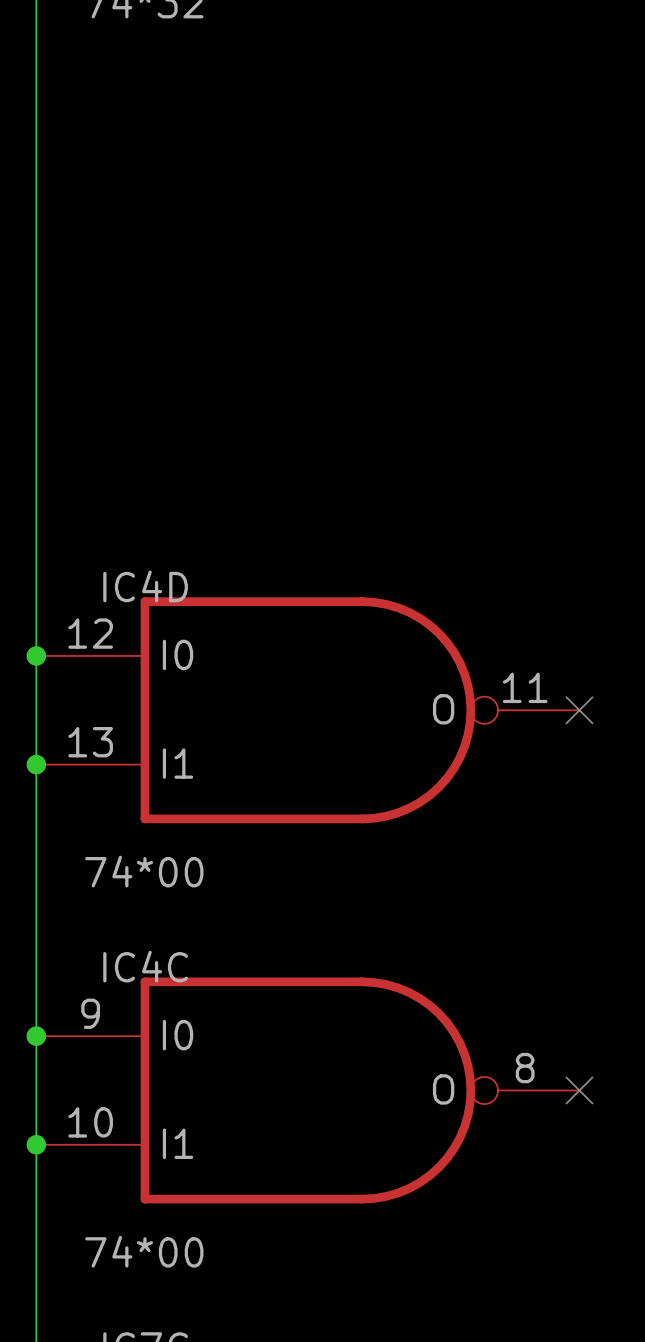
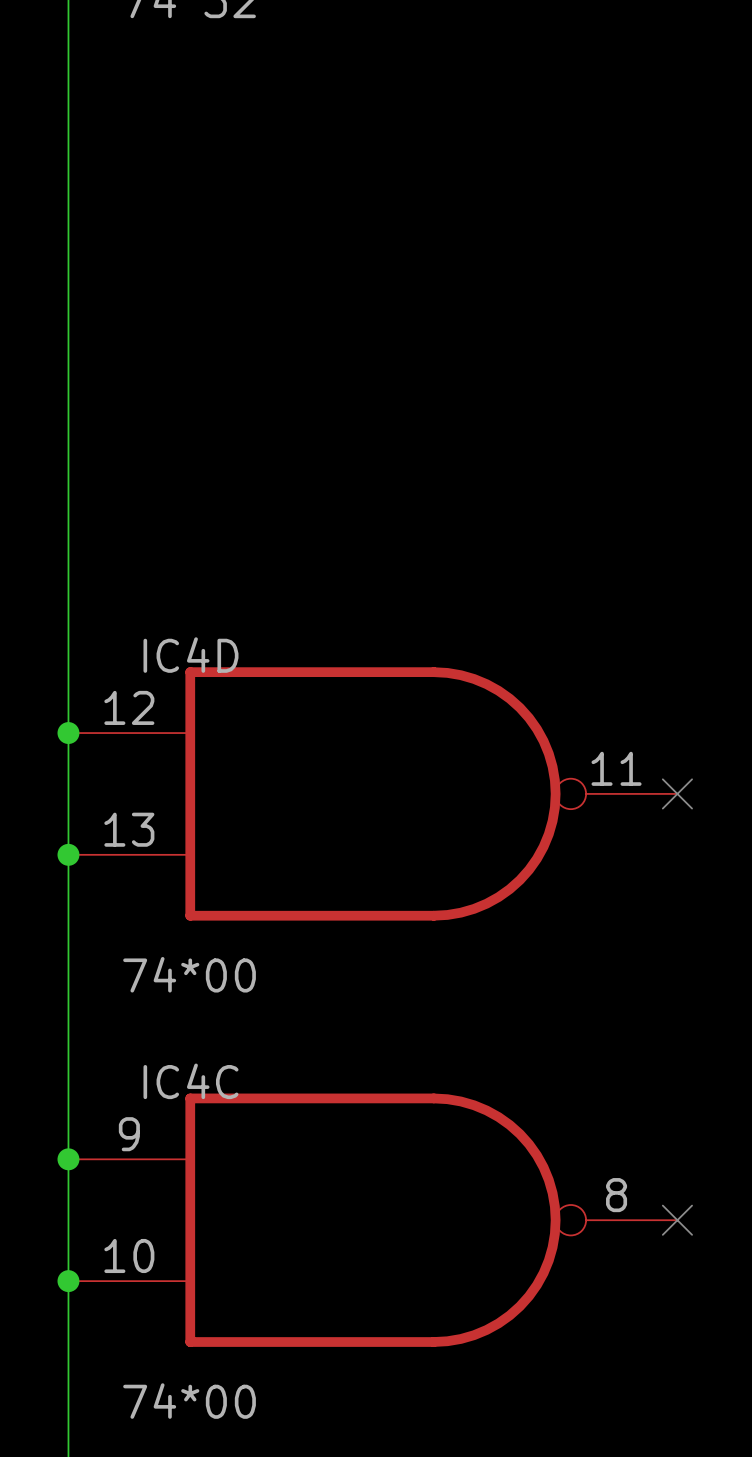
IC4D pin name: I0 (178, 654) -> none
IC4D pin name: O (443, 709) -> none
IC4D pin name: I1 (178, 763) -> none
IC4C pin name: I0 (178, 1035) -> none
IC4C pin name: O (443, 1089) -> none
IC4C pin name: I1 (178, 1143) -> none

